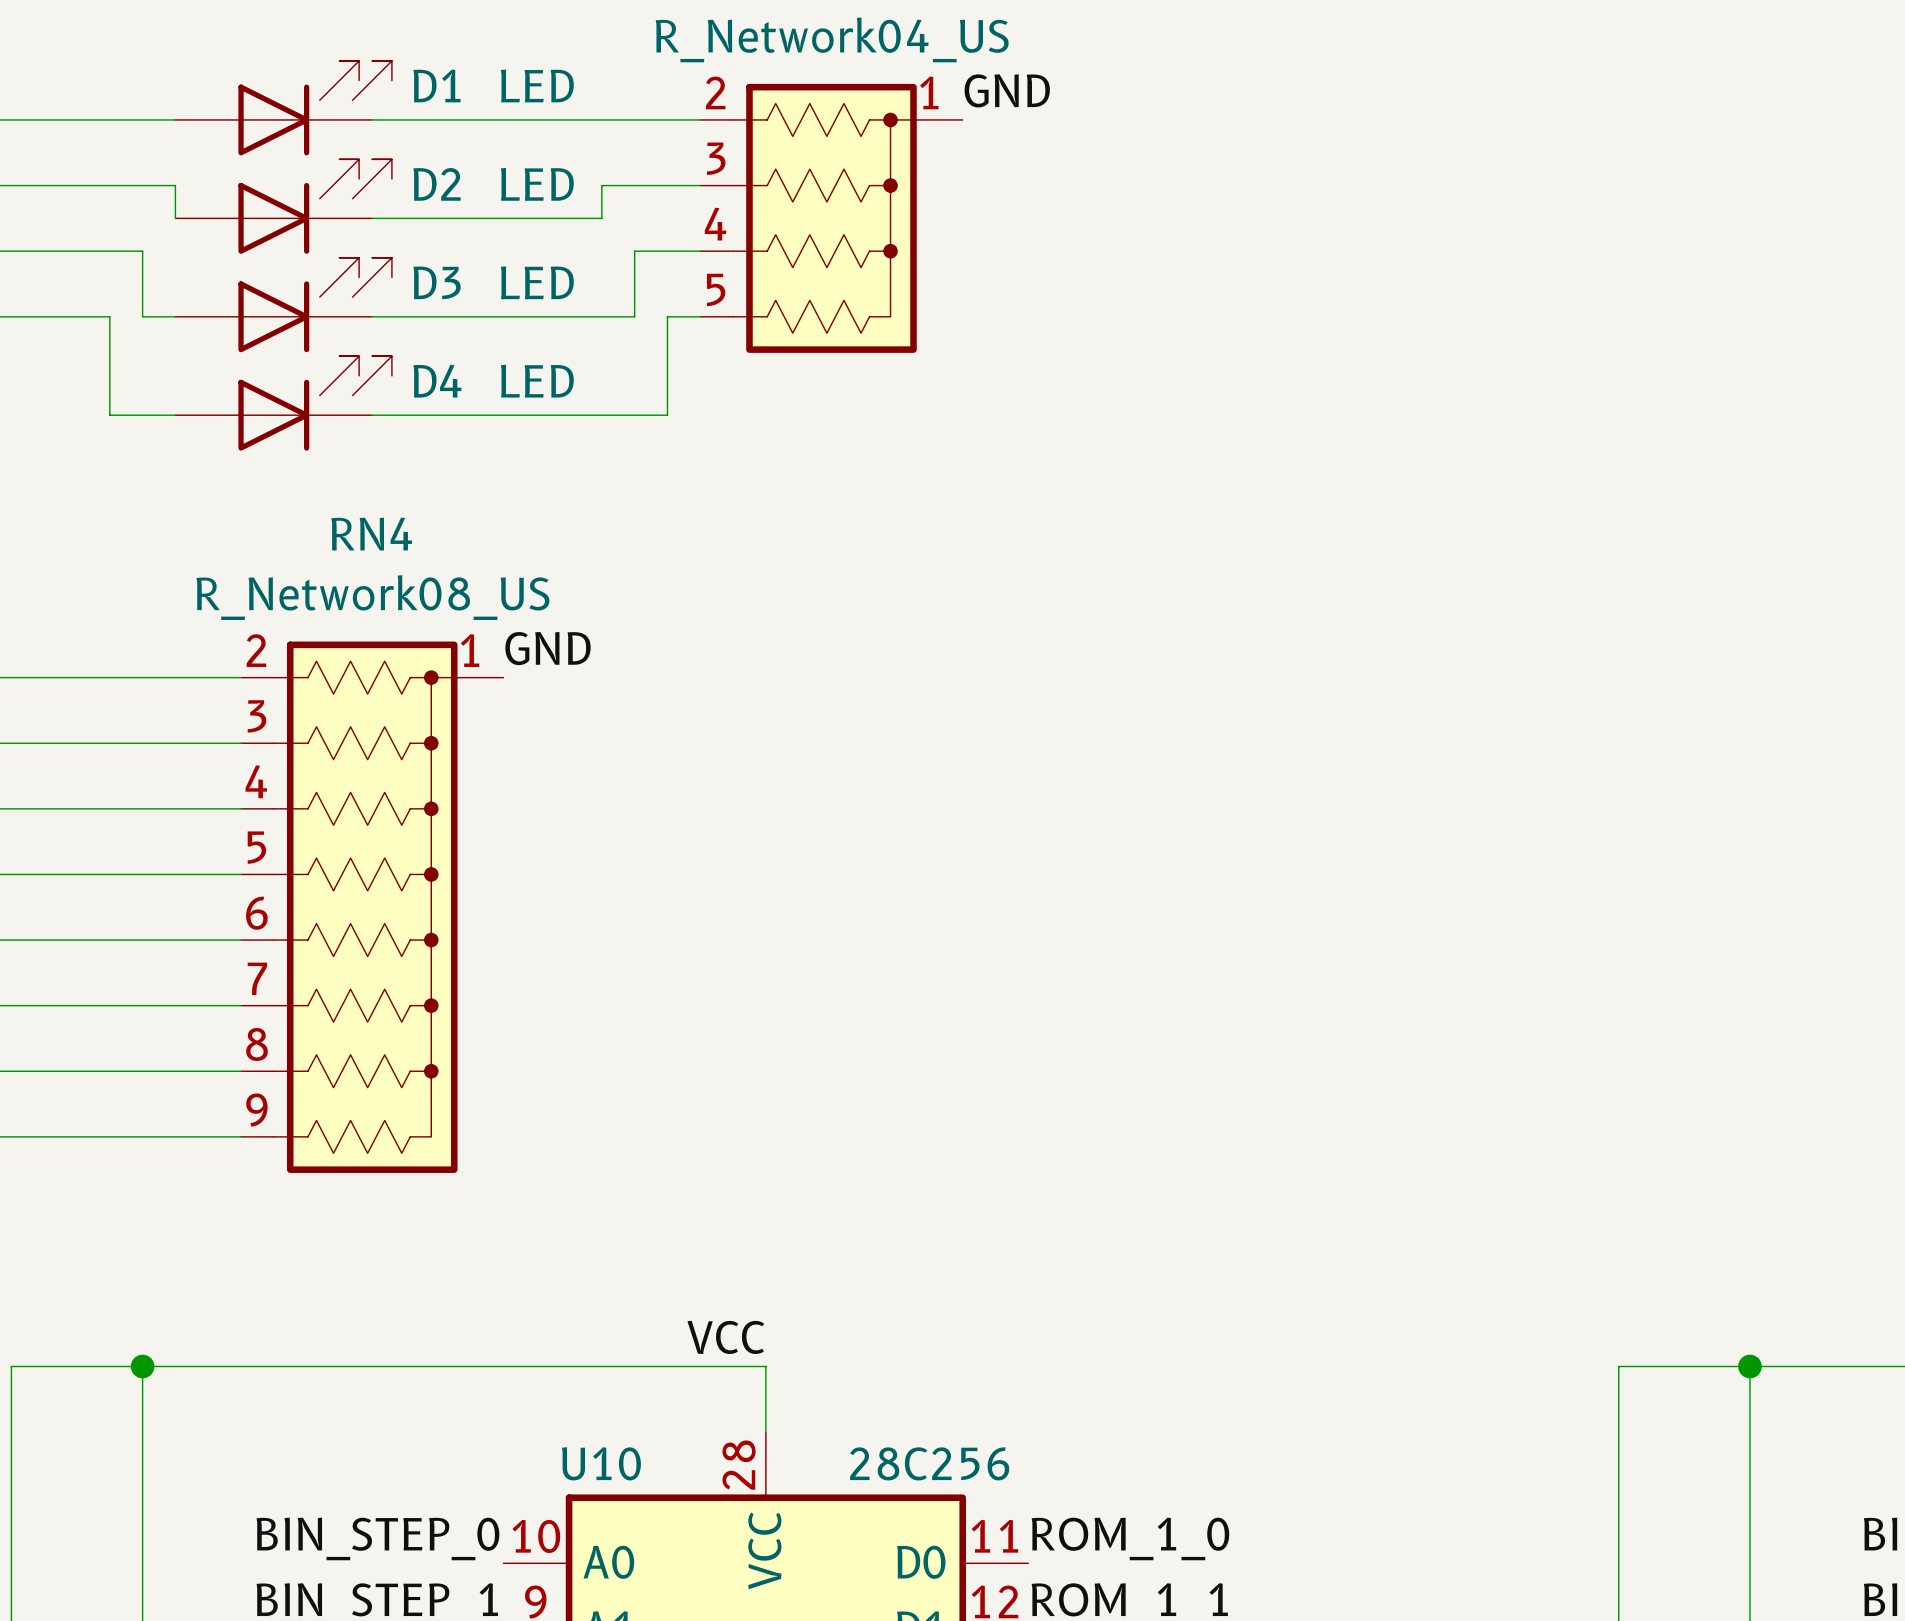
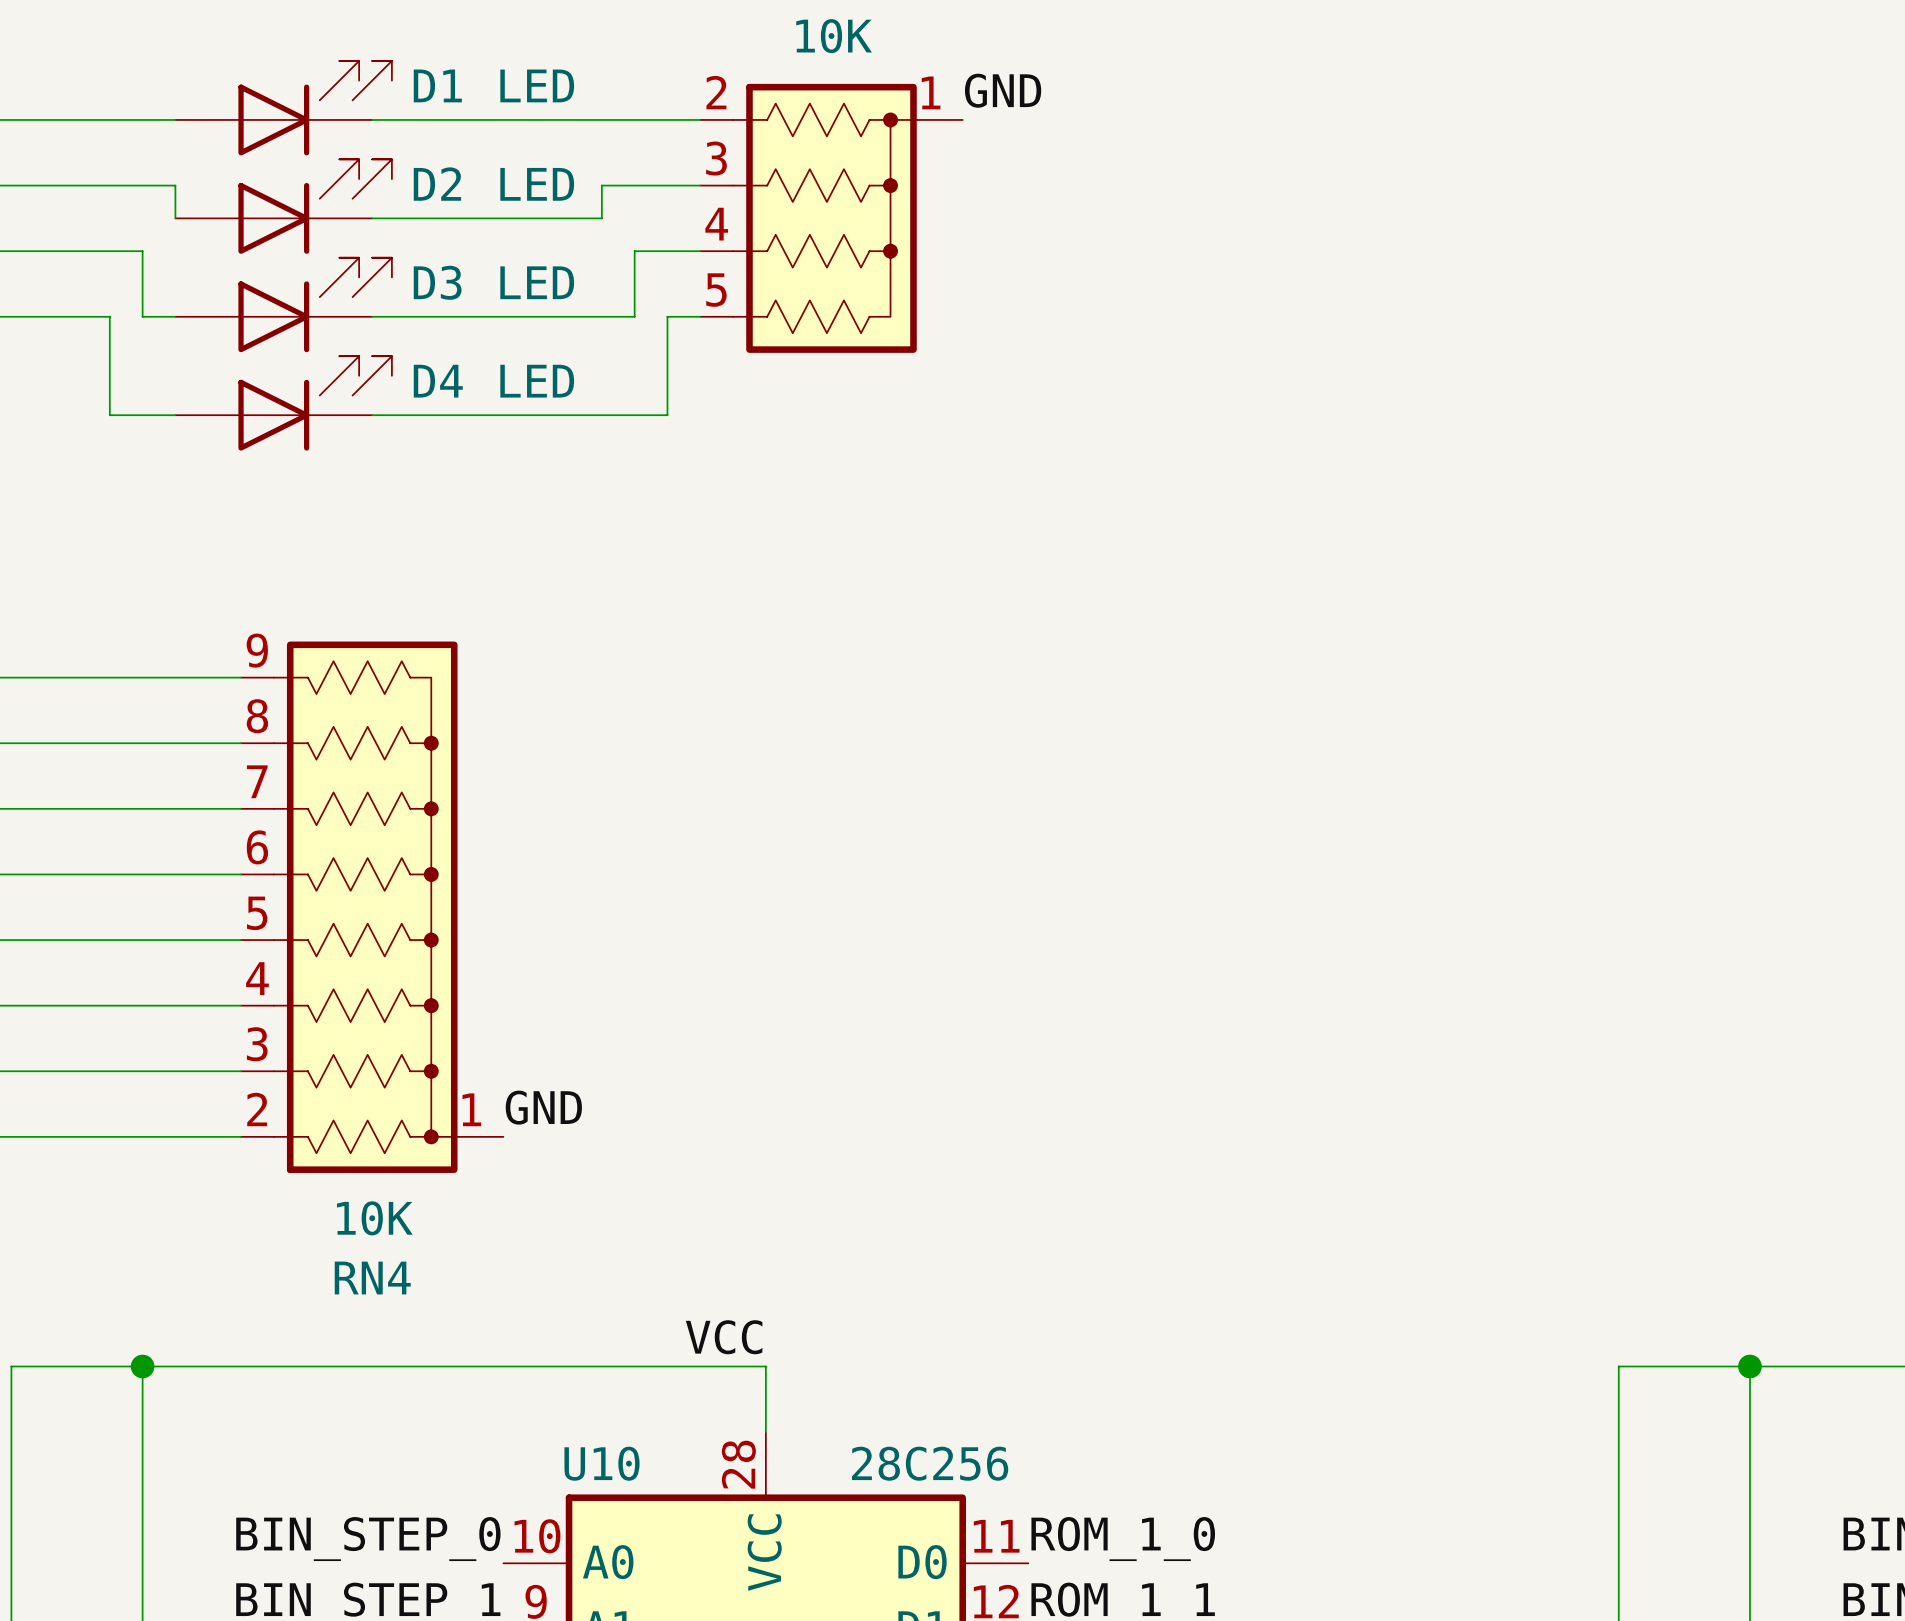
part value: R_Network04_US (832, 39) -> 10K (834, 36)
RN4 value: R_Network08_US (372, 597) -> 10K (374, 1218)
label position: GND (547, 648) -> GND (543, 1107)
RN4 flip: as is (365, 907) -> up-down (365, 907)

